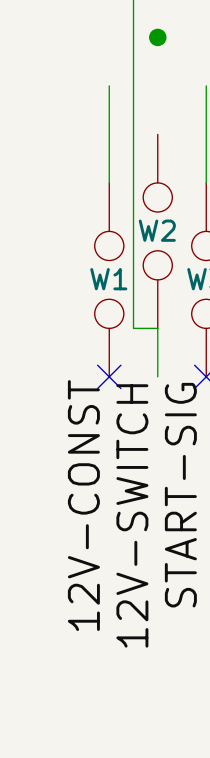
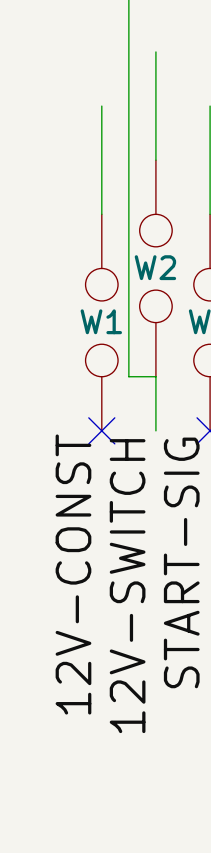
wire: none -> (155, 51) (155, 160)
junction: (157, 37) -> none

